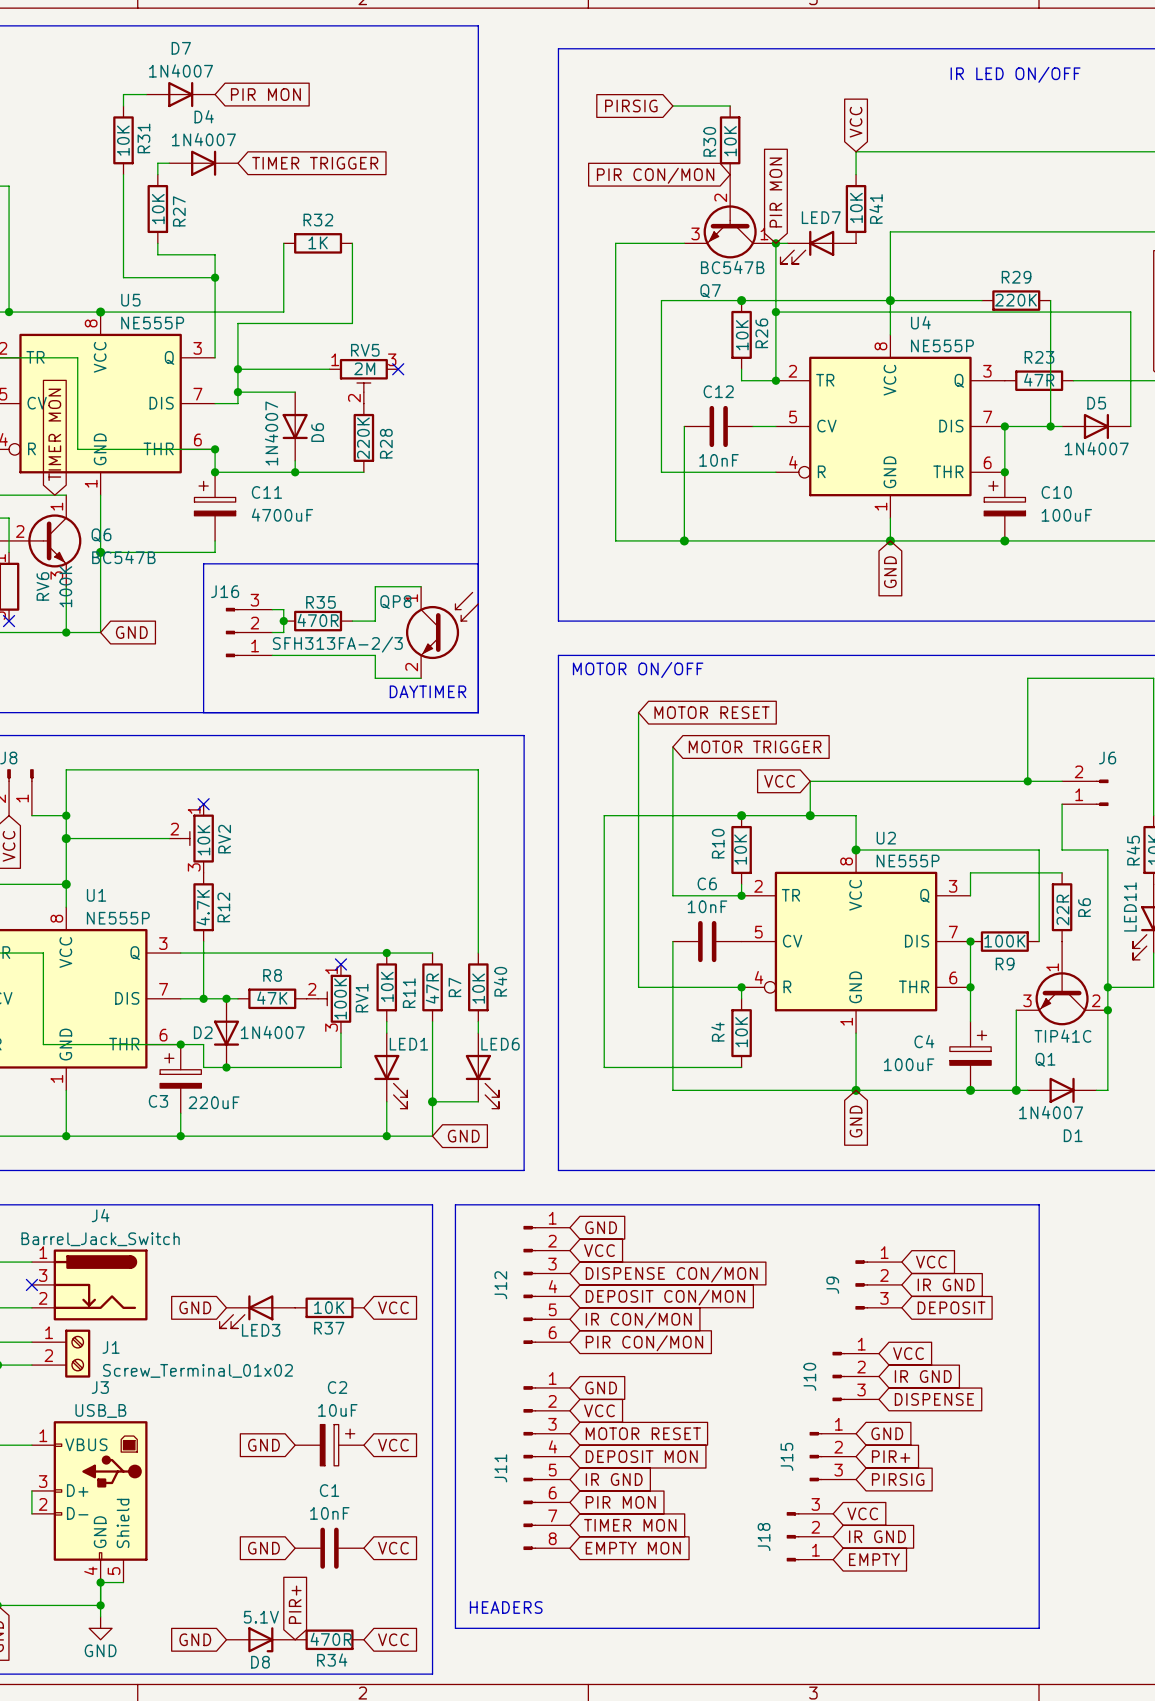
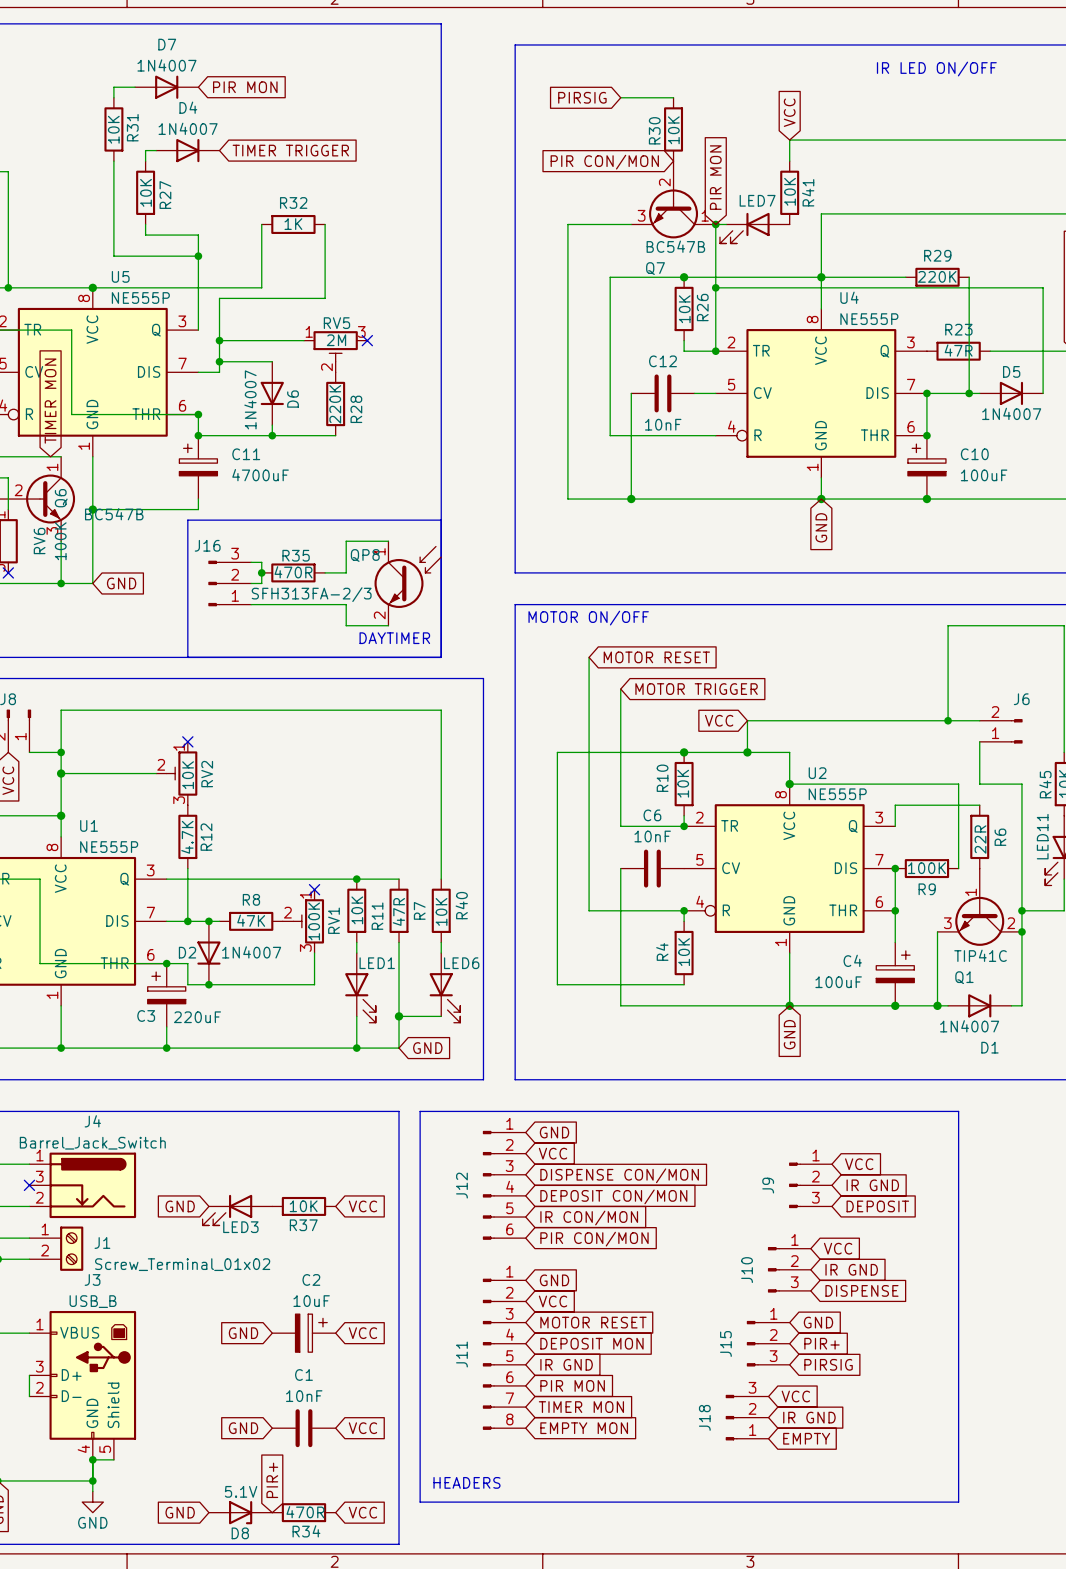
Q6 name rotation: 0° (101, 535) -> 90° counterclockwise (61, 498)
Q6 name position: Q6 (101, 535) -> Q6 (61, 498)

